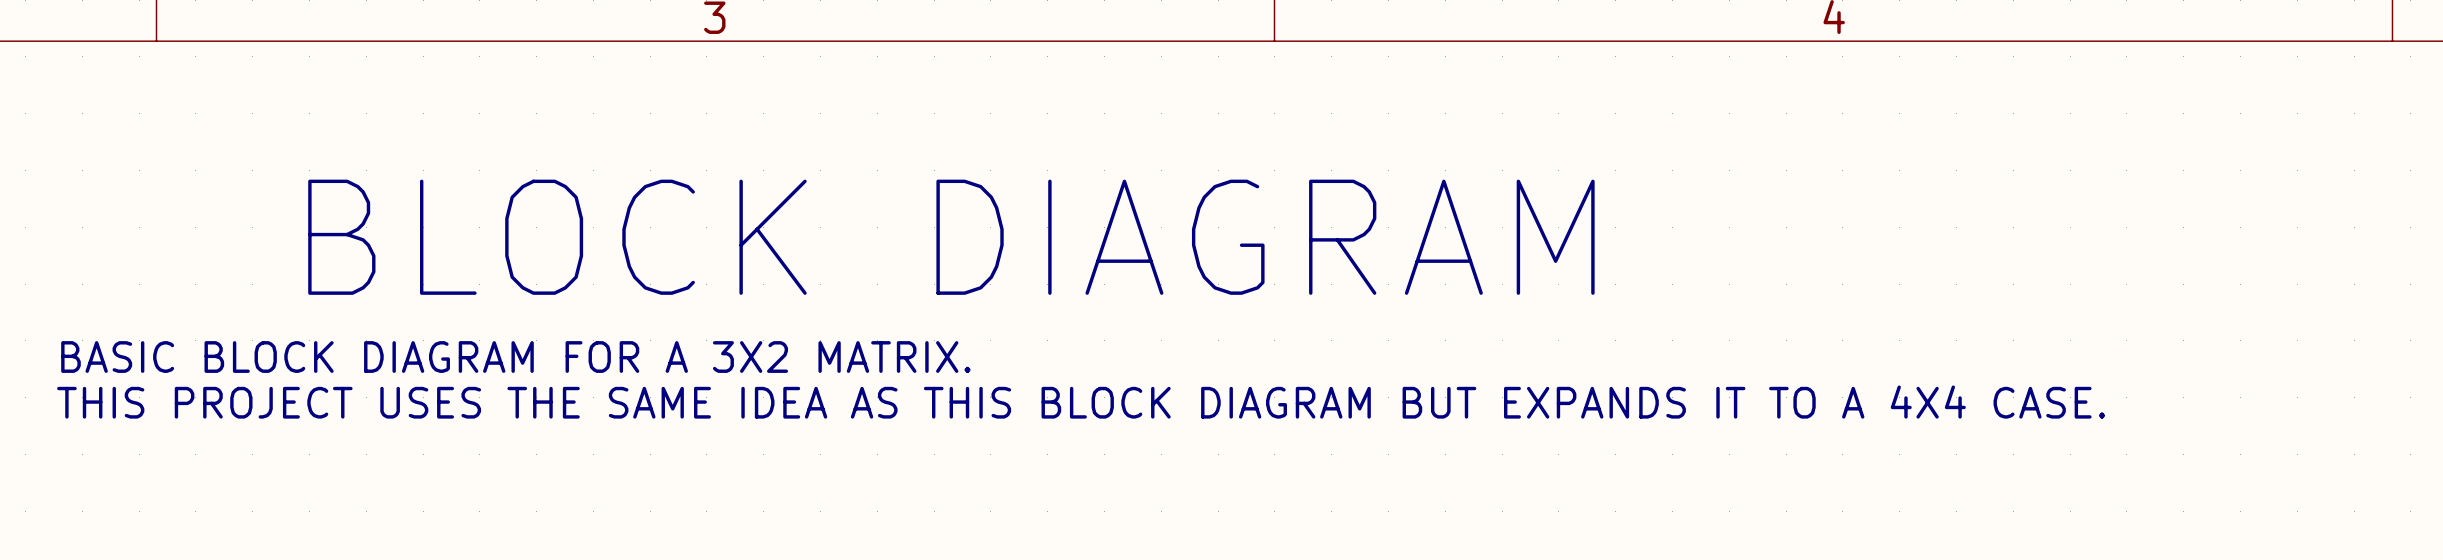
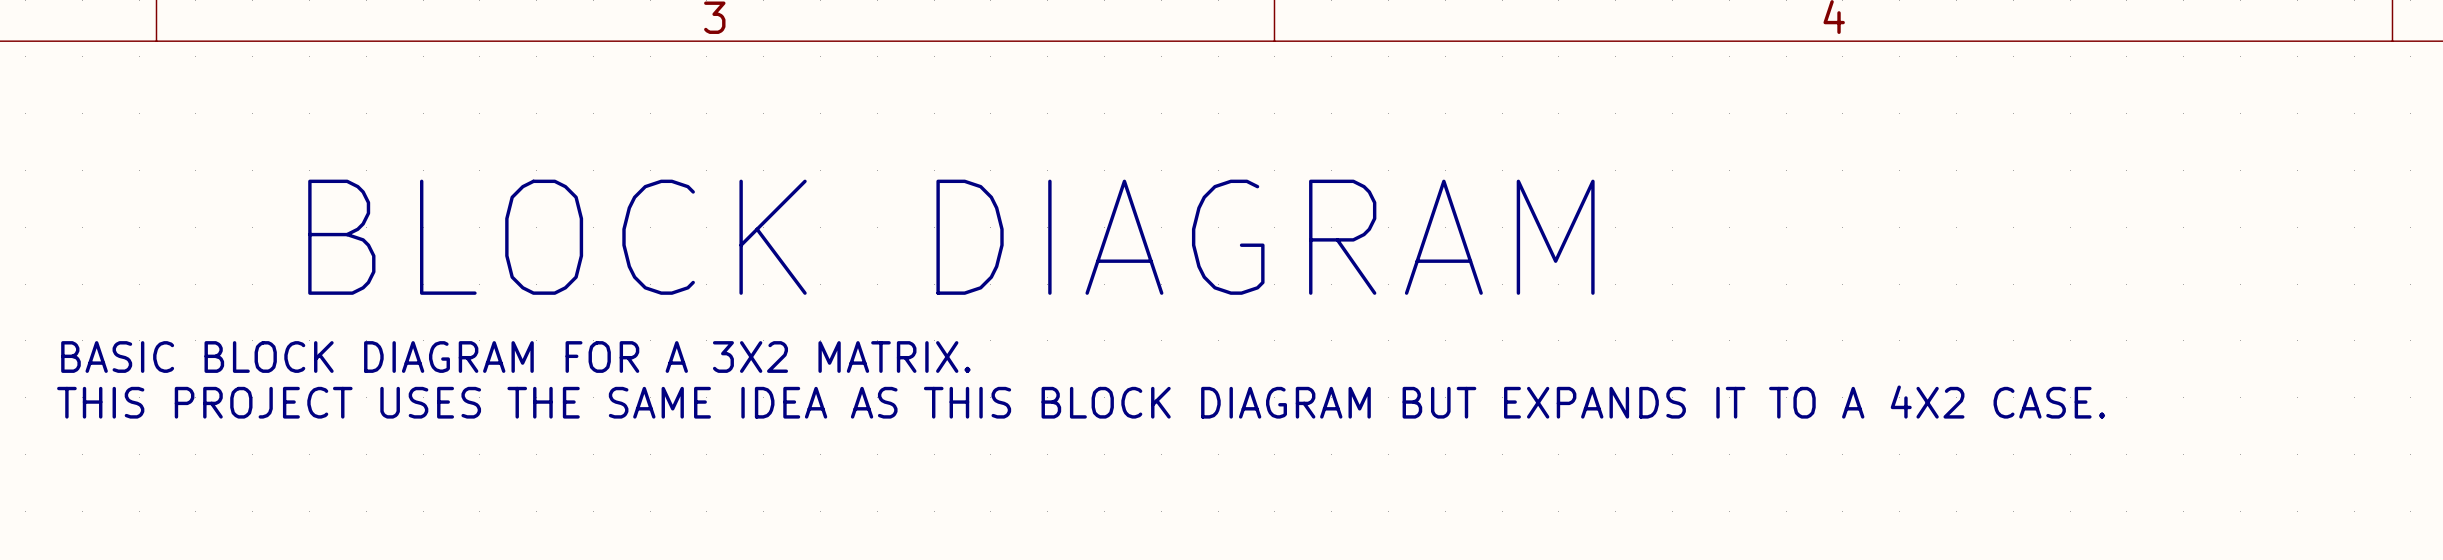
text: THIS PROJECT USES THE SAME IDEA AS THIS BLOCK DIAGRAM BUT EXPANDS IT TO A 4X4 CASE. (1081, 402) -> THIS PROJECT USES THE SAME IDEA AS THIS BLOCK DIAGRAM BUT EXPANDS IT TO A 4X2 CASE. (1081, 402)

